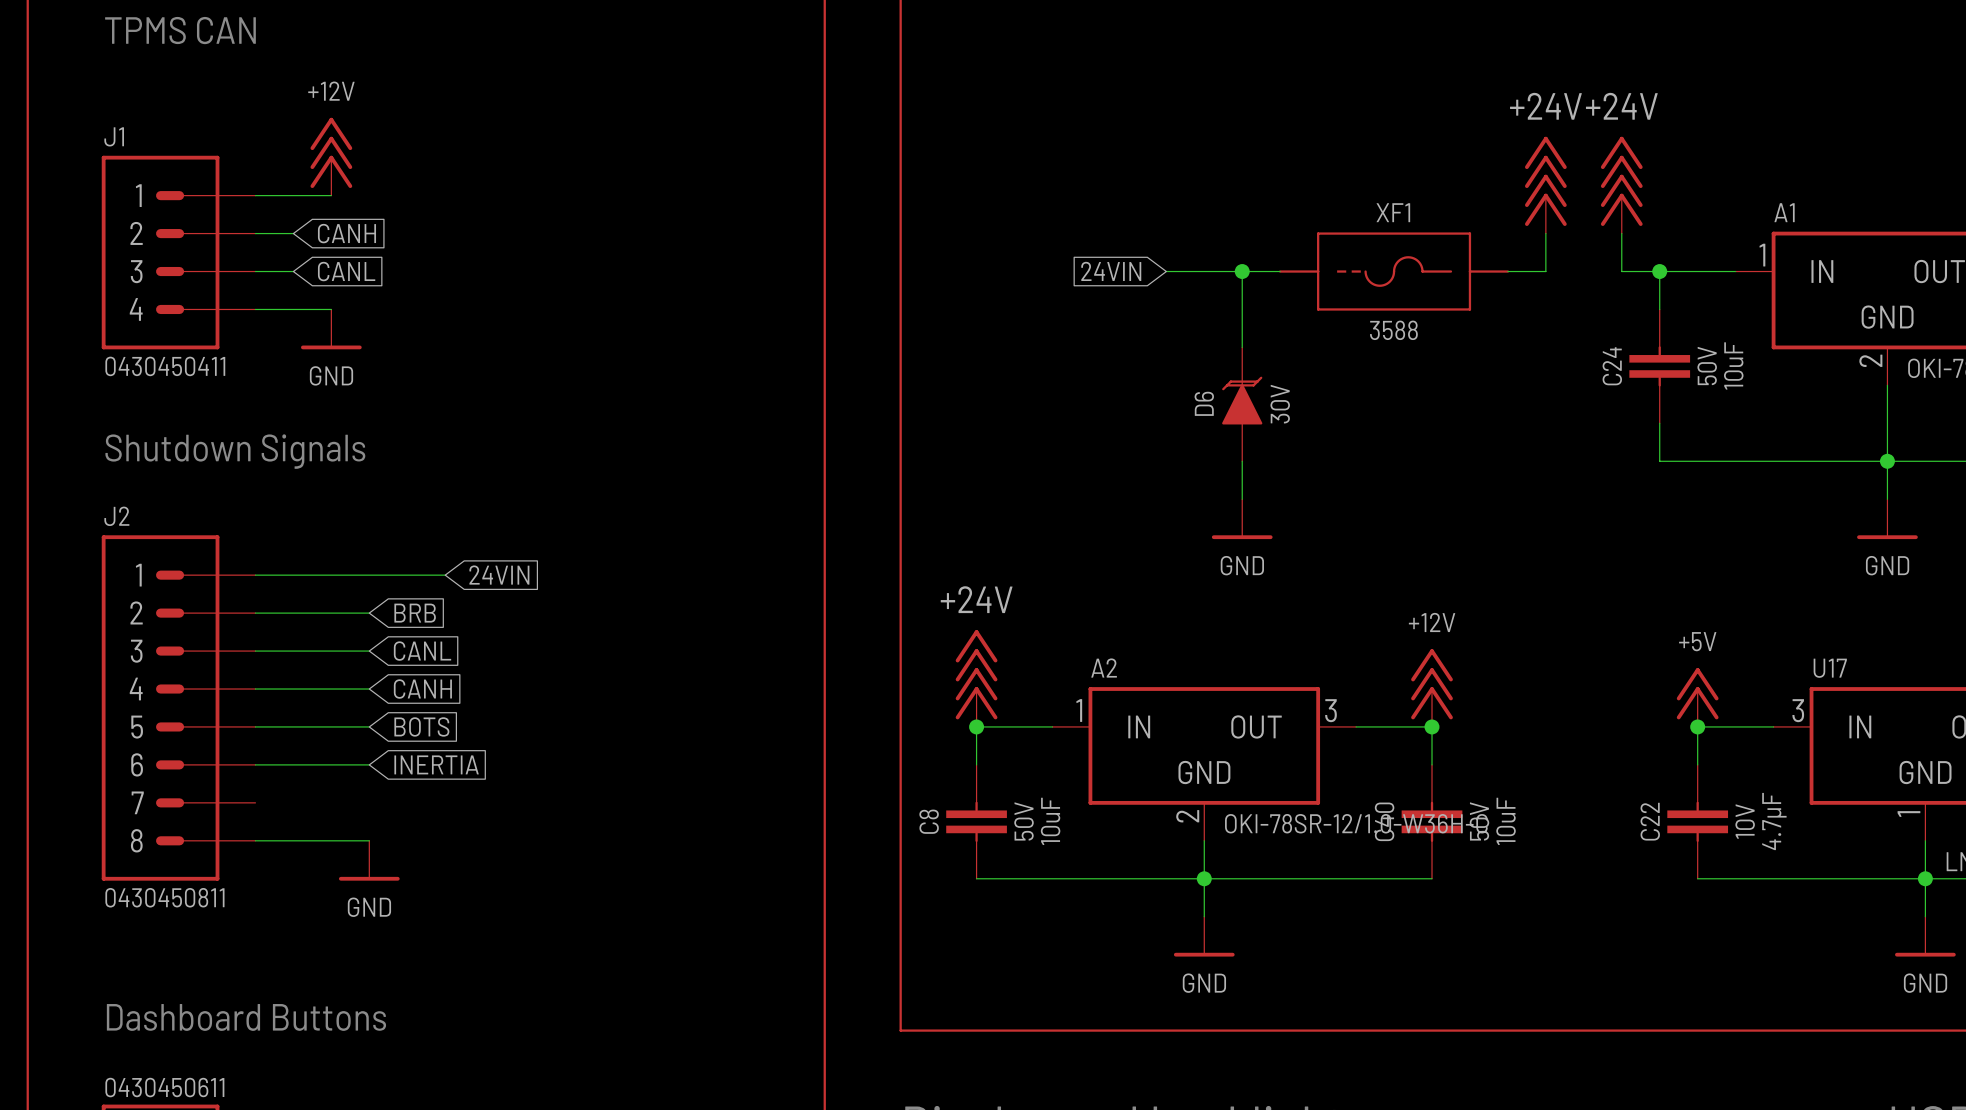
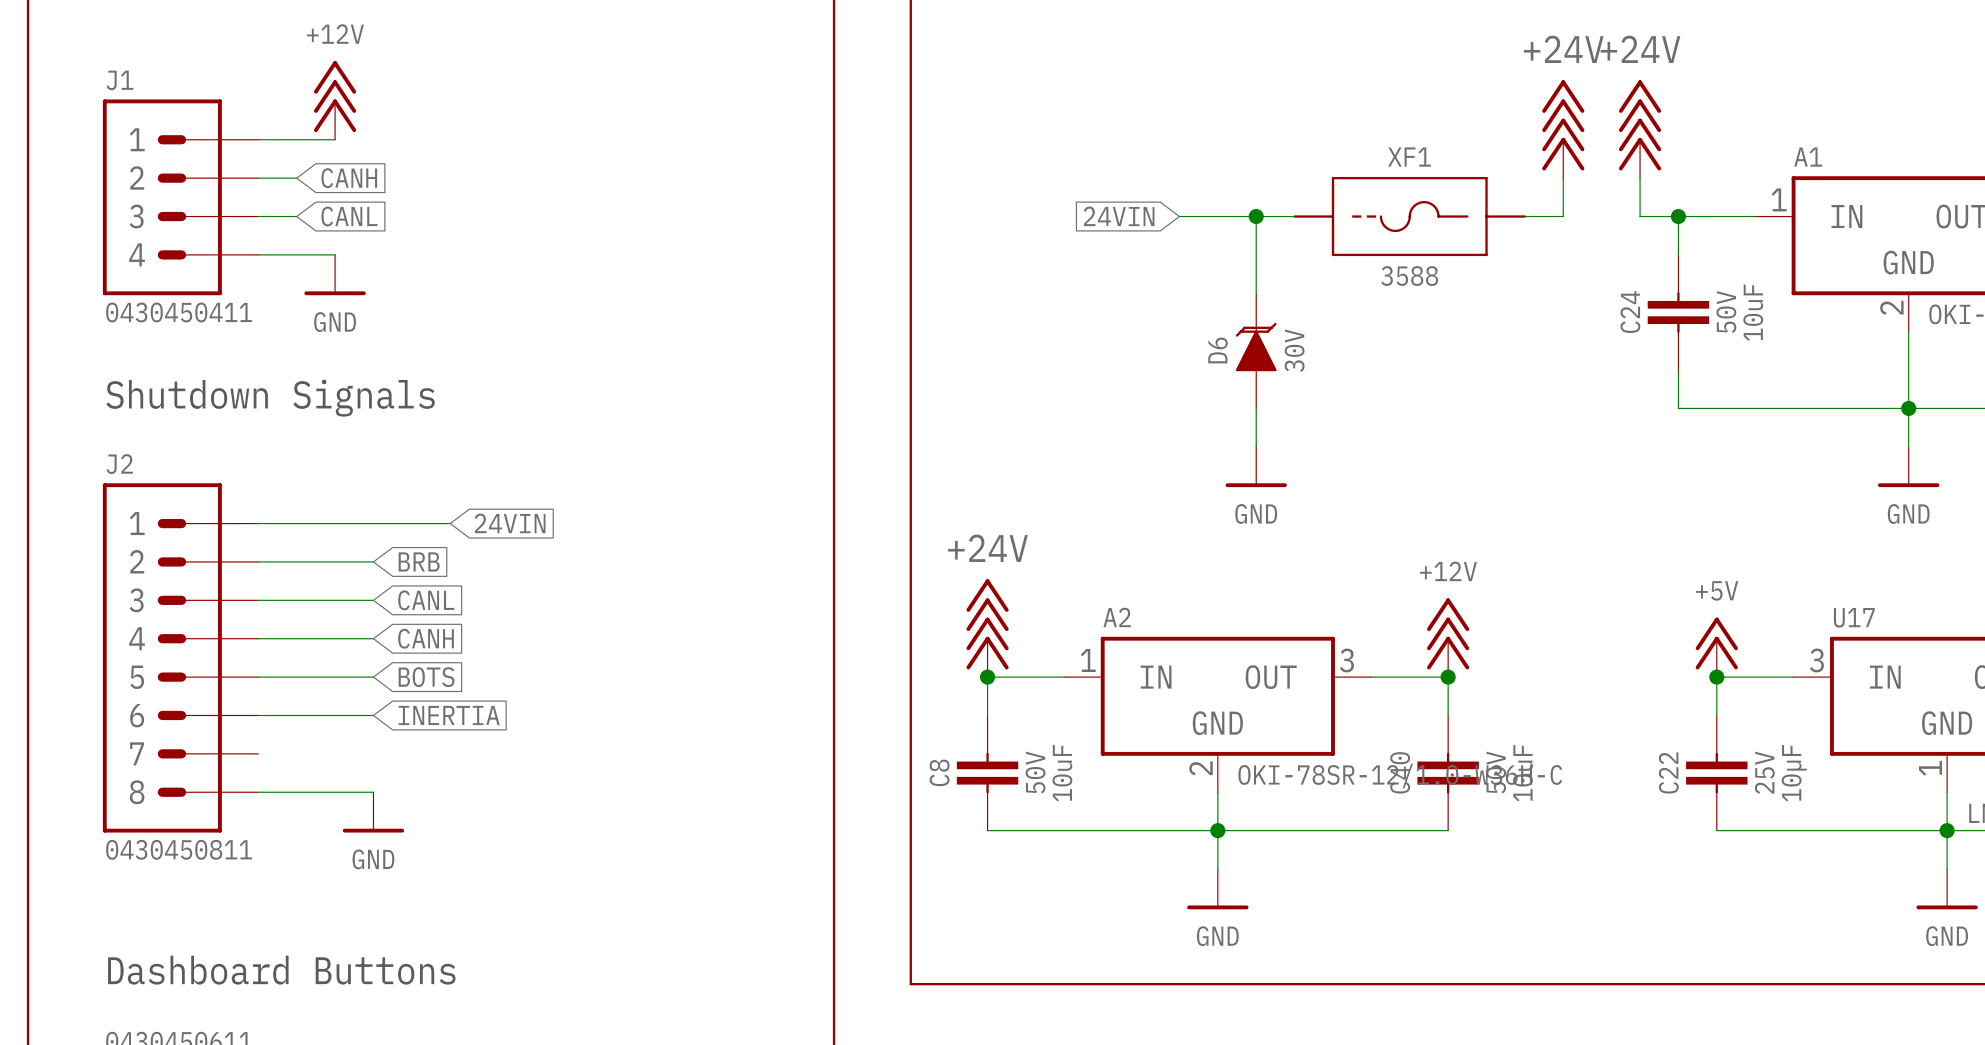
C22 text: 10V (1745, 821) -> 25V (1764, 772)
C22 text: 4.7µF (1774, 821) -> 10µF (1794, 773)

